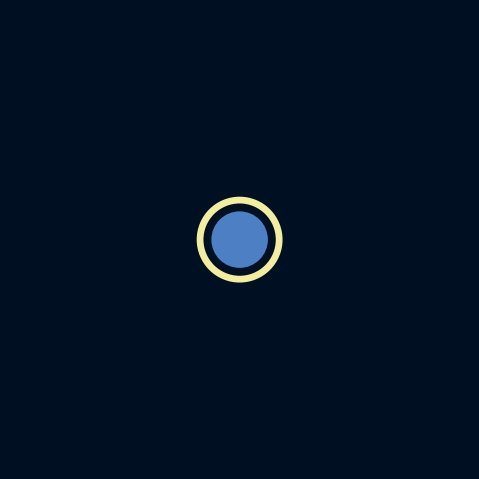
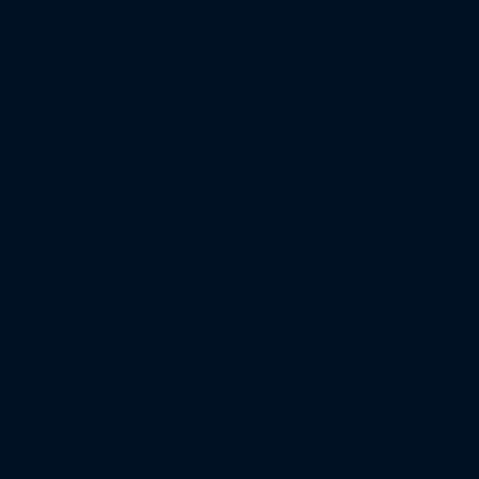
part: (239, 239) -> none

